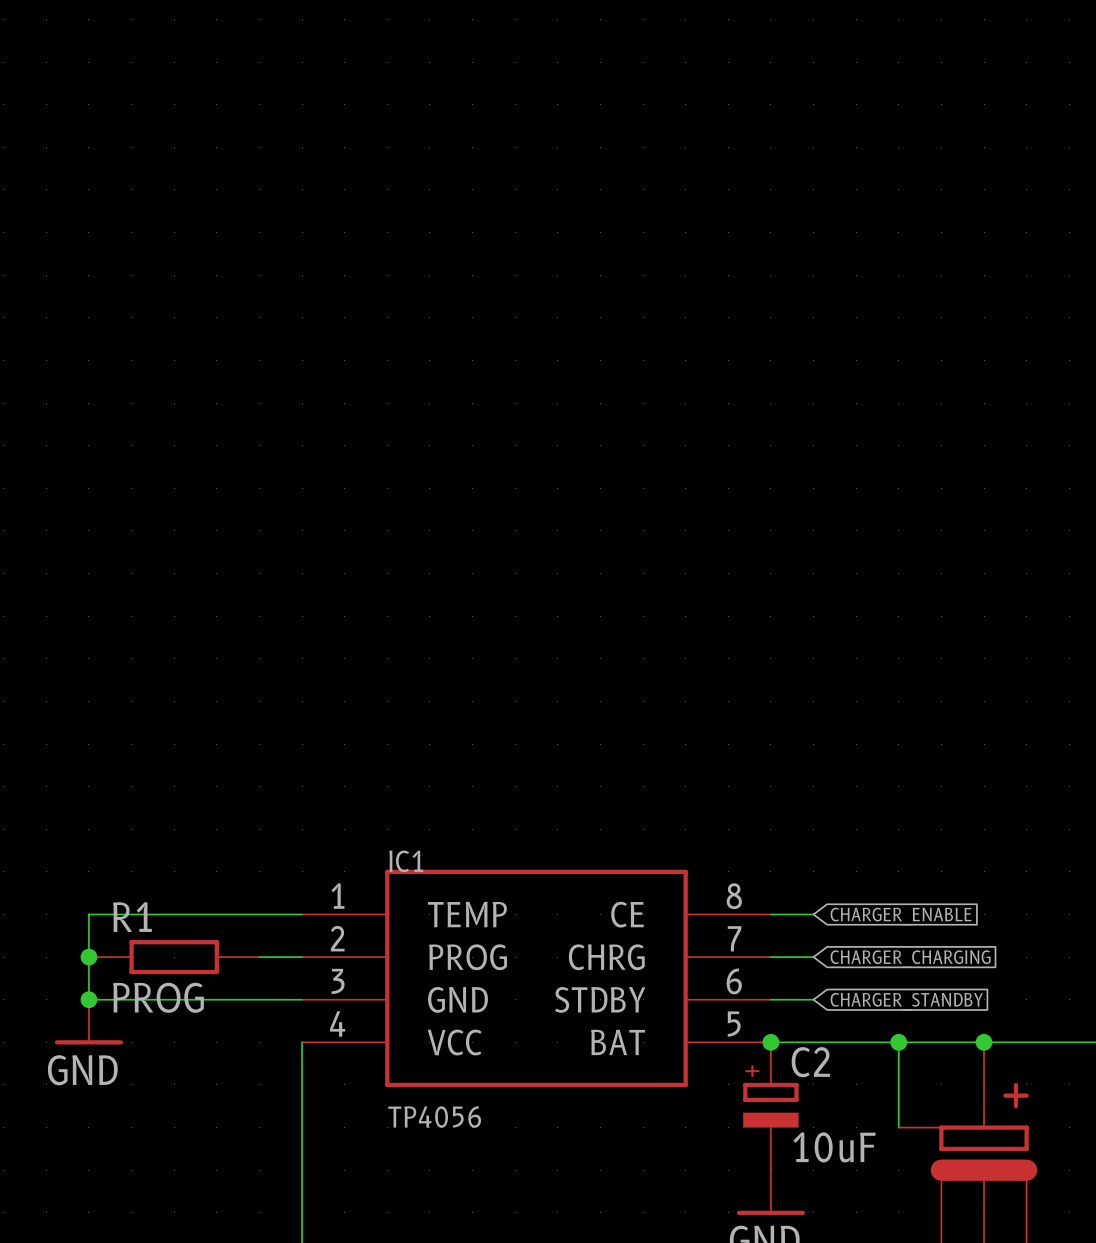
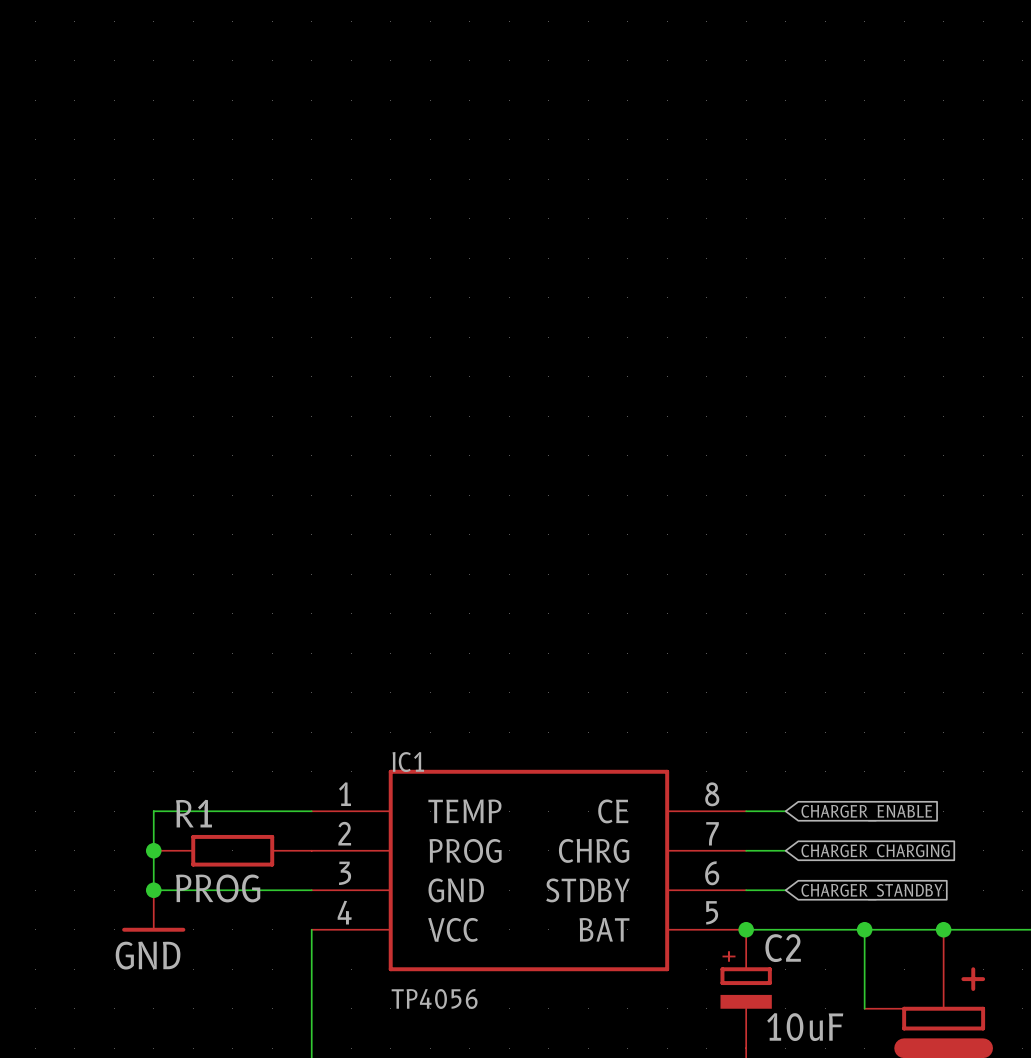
wire: (131, 914) (88, 914) (88, 999) (131, 999) -> (153, 811) (153, 890)
junction: (88, 957) -> none
junction: none -> (153, 850)
R1 position: (174, 957) -> (232, 850)
junction: (88, 999) -> none
junction: none -> (153, 890)
power symbol position: GND (88, 1022) -> GND (153, 910)

